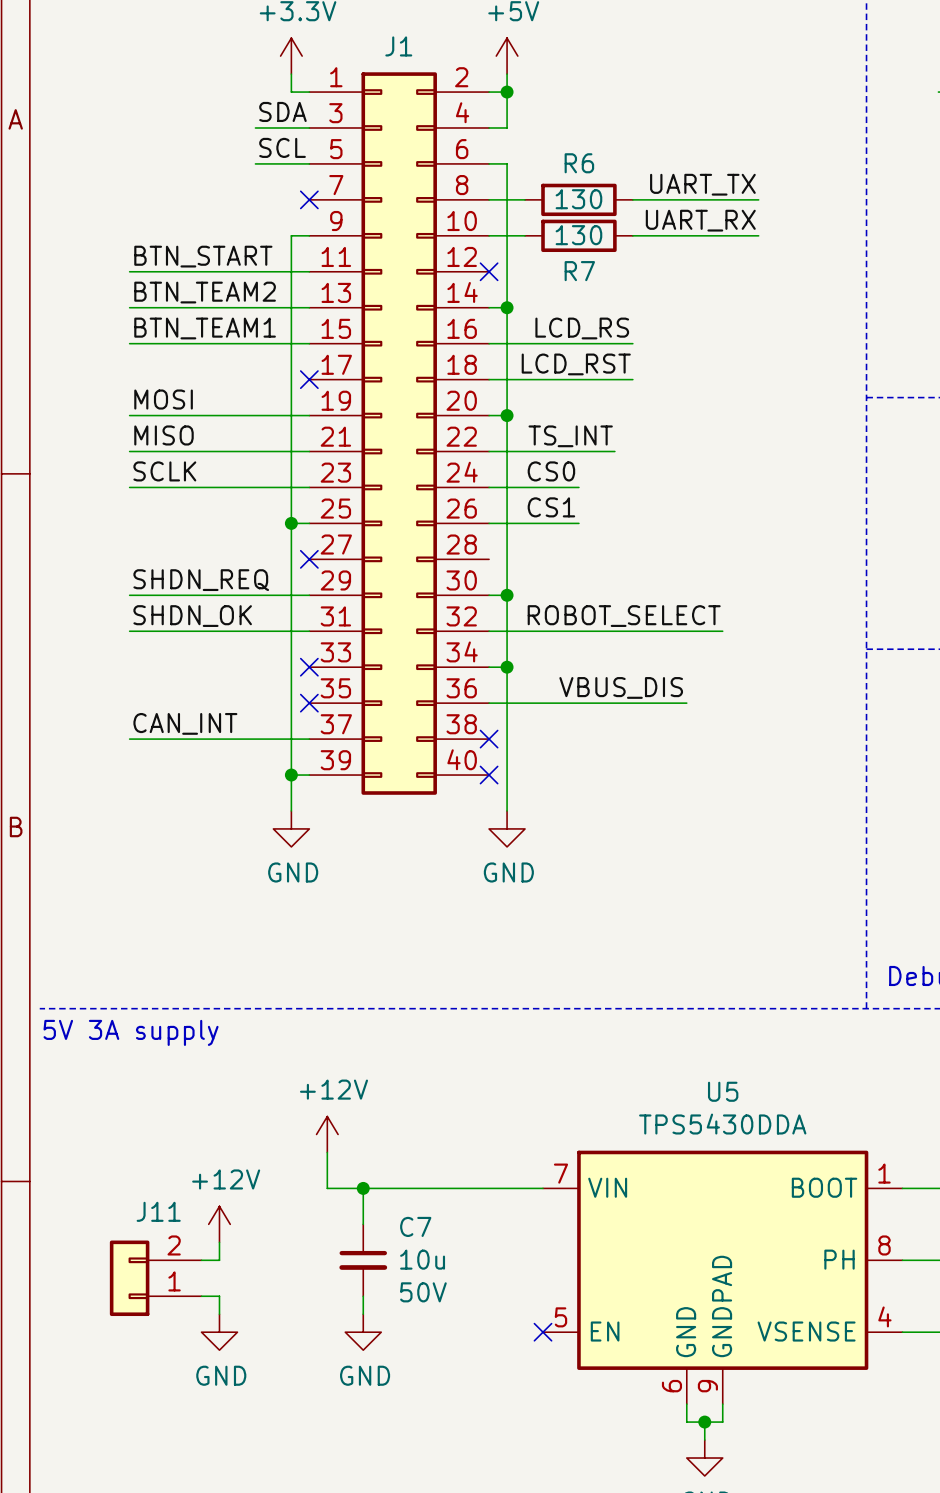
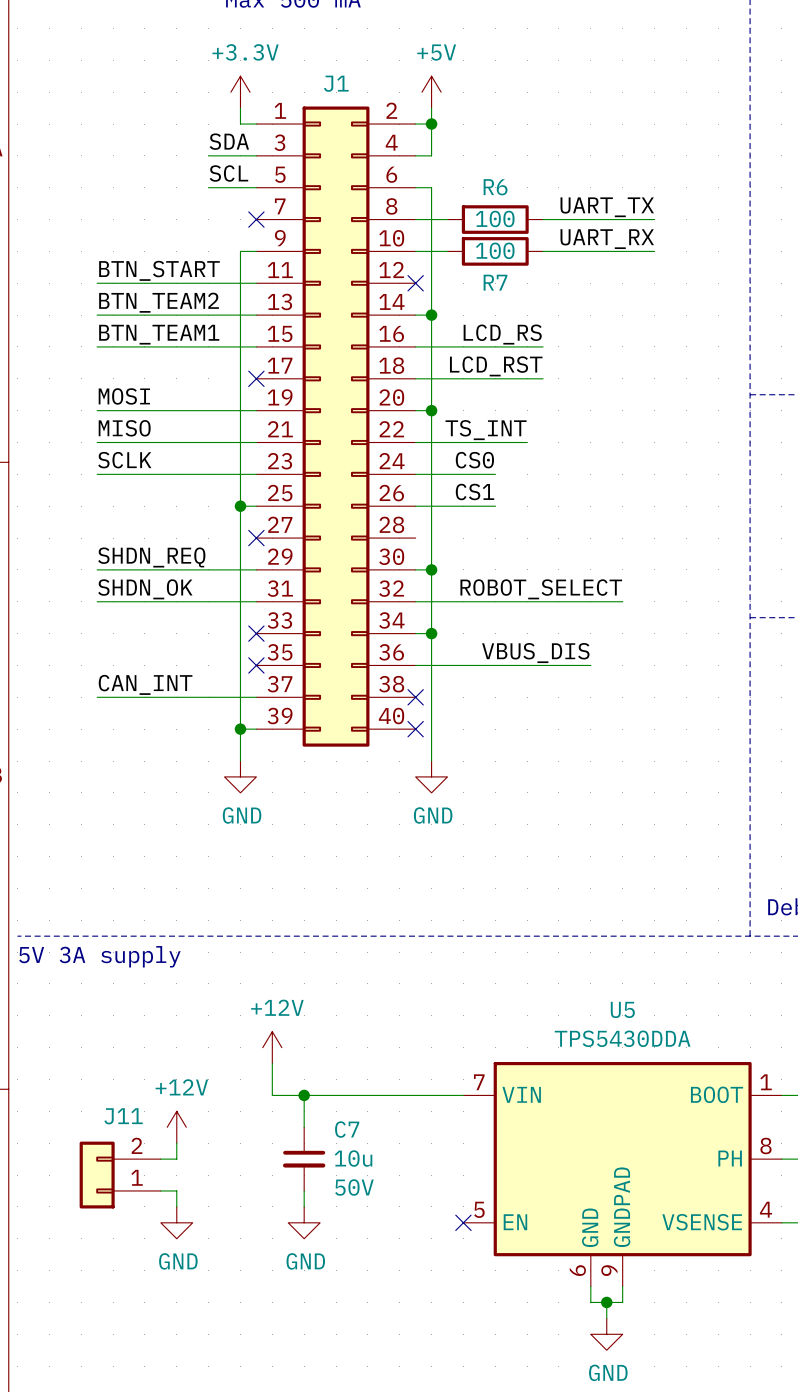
R6 value: 130 (578, 199) -> 100 (495, 218)
R7 value: 130 (578, 235) -> 100 (495, 250)

